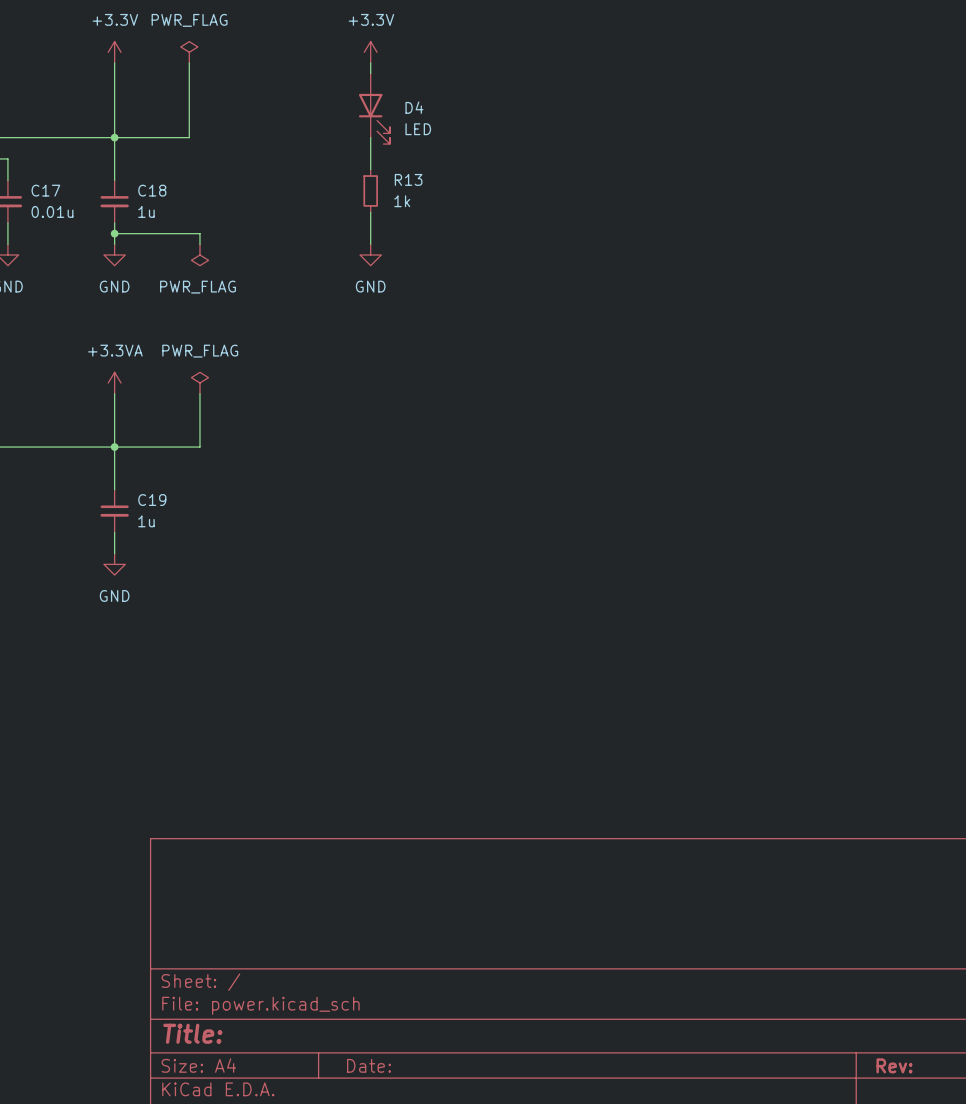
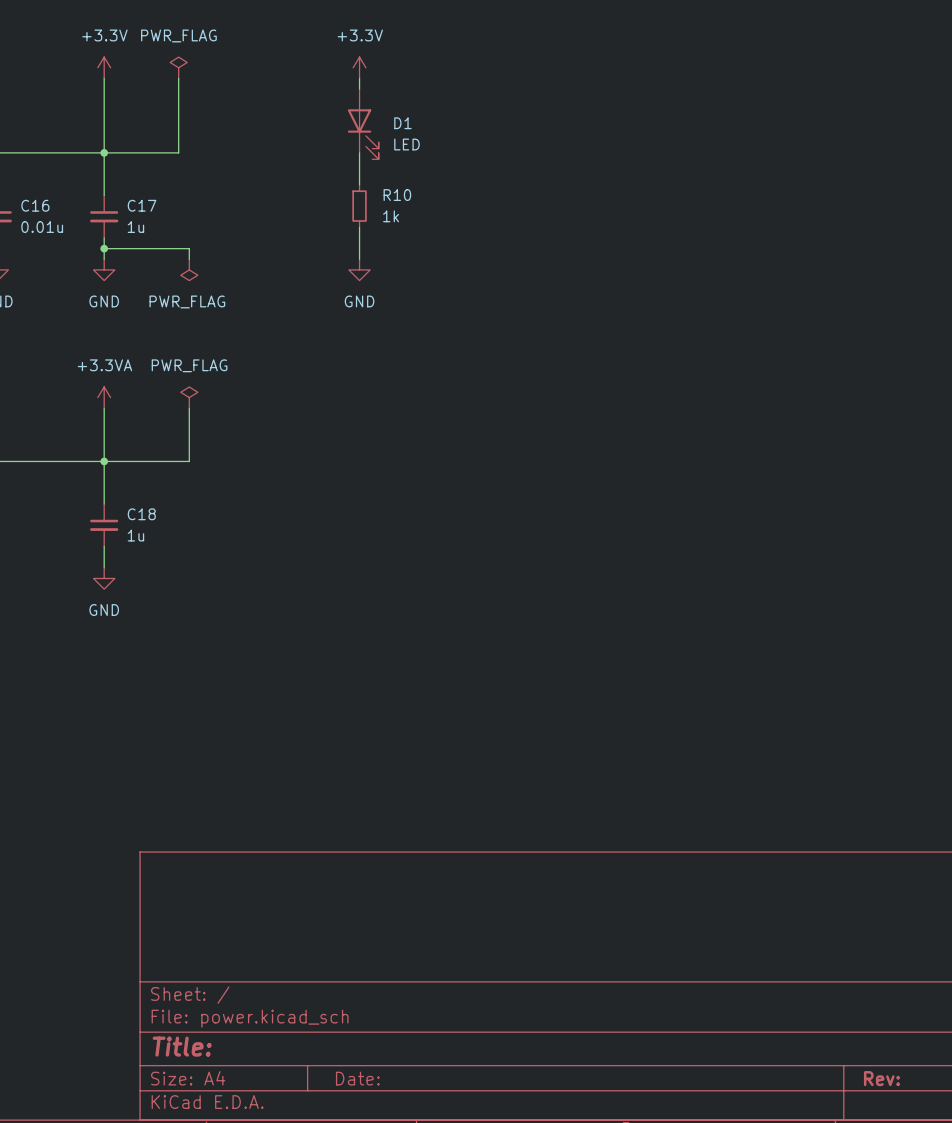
D4 name: D4 (414, 107) -> D1 (402, 123)
R13 name: R13 (408, 179) -> R10 (397, 195)
C17 name: C17 (45, 190) -> C16 (35, 205)
C18 name: C18 (152, 190) -> C17 (142, 205)
C19 name: C19 (152, 500) -> C18 (141, 514)

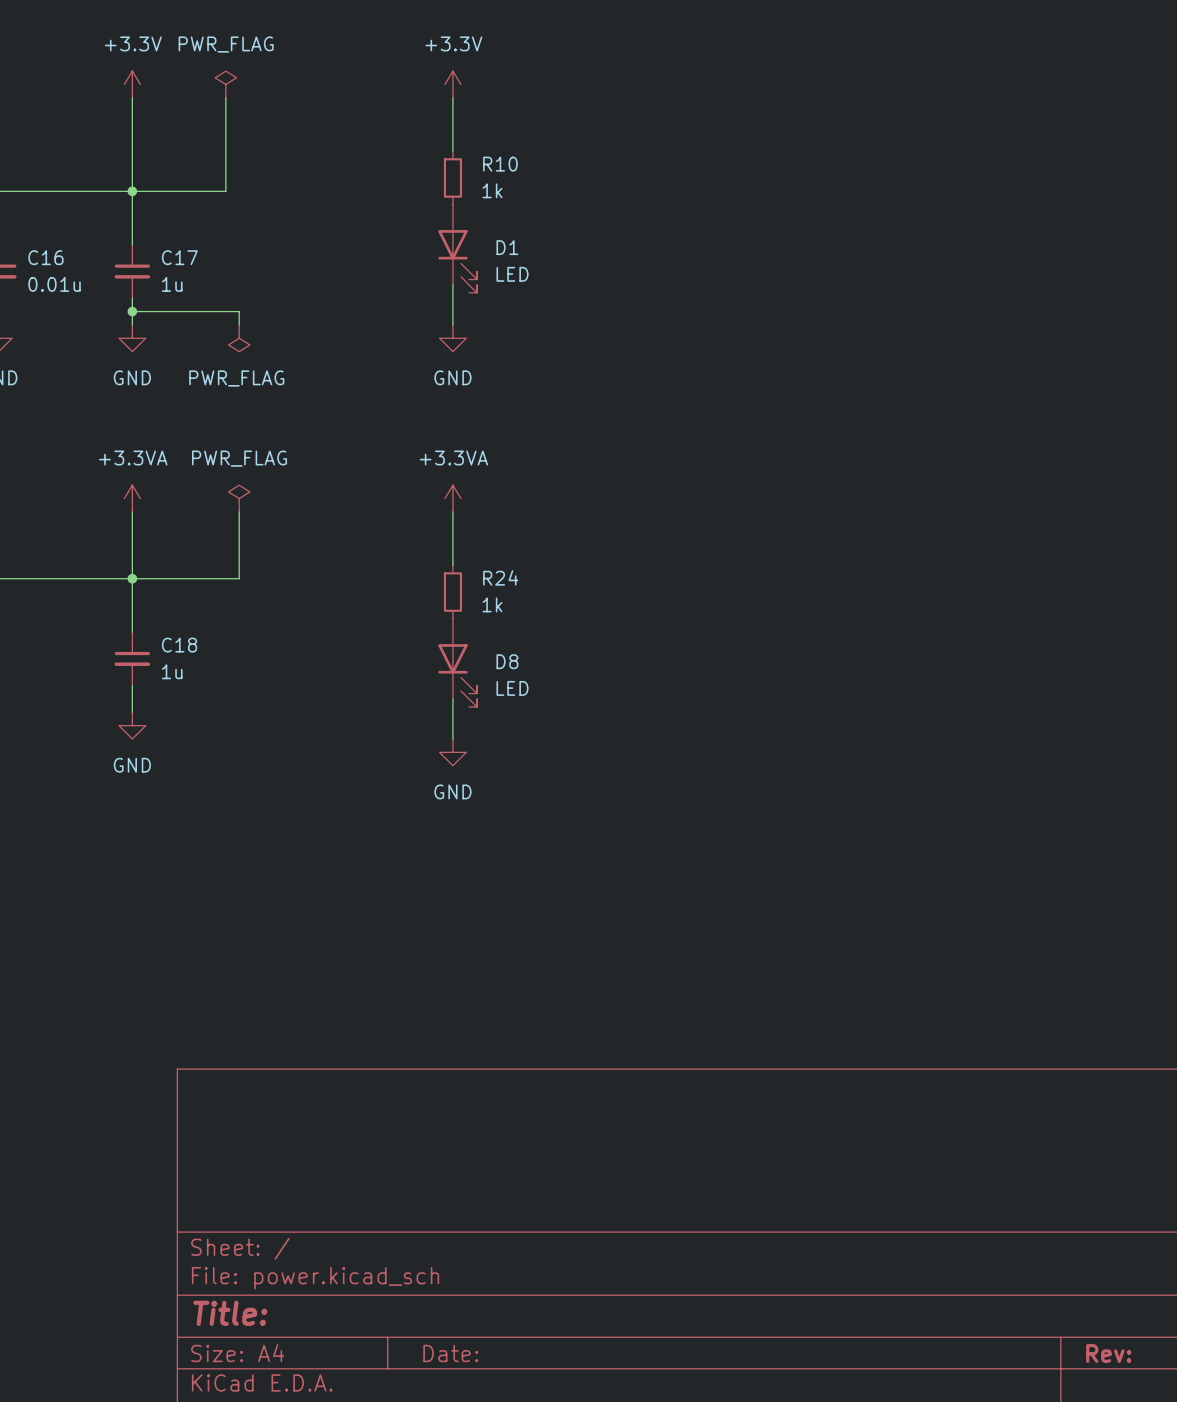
D1 position: (363, 124) -> (457, 248)
R10 position: (359, 206) -> (452, 177)
power symbol: none -> +3.3VA (452, 498)
wire: none -> (452, 511) (452, 565)
R24: none -> 1k (452, 592)
D8: none -> LED (457, 662)
wire: none -> (452, 698) (452, 739)
power symbol: none -> GND (452, 752)

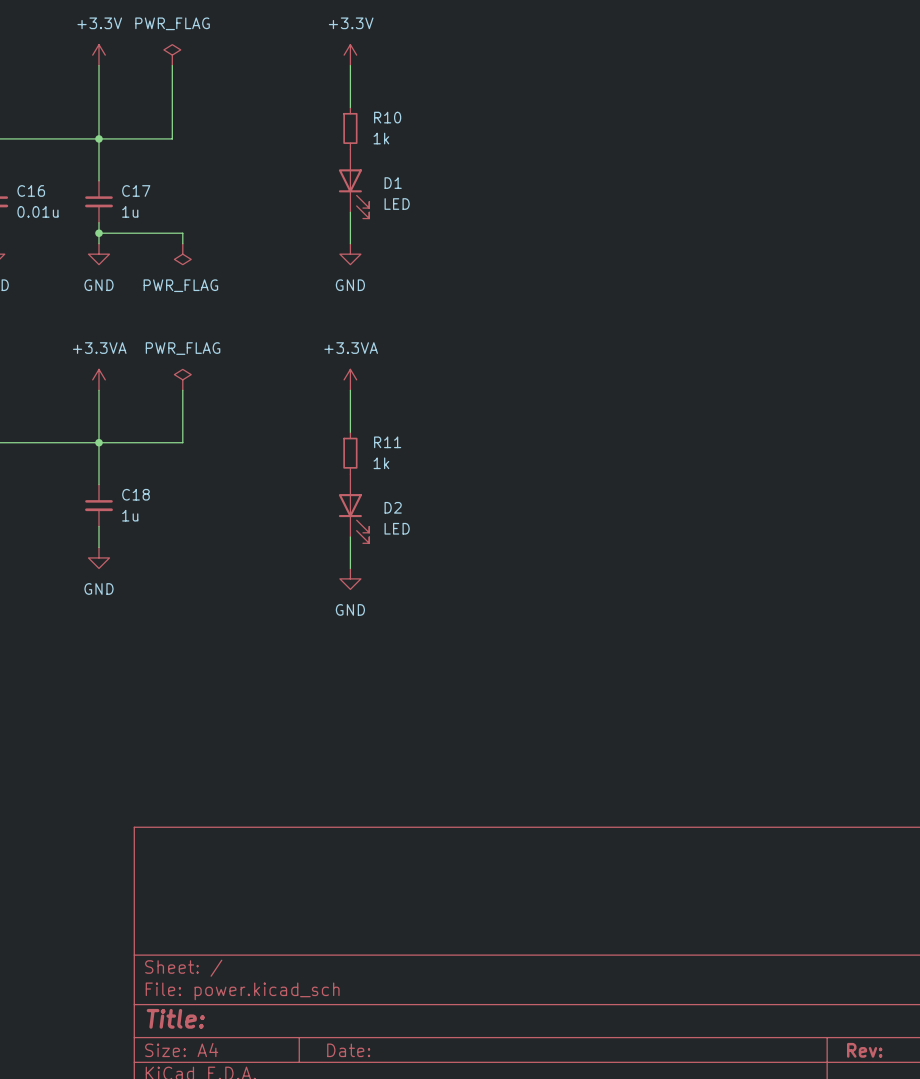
R24 name: R24 (500, 577) -> R11 (387, 442)
D8 name: D8 (507, 661) -> D2 (393, 507)

